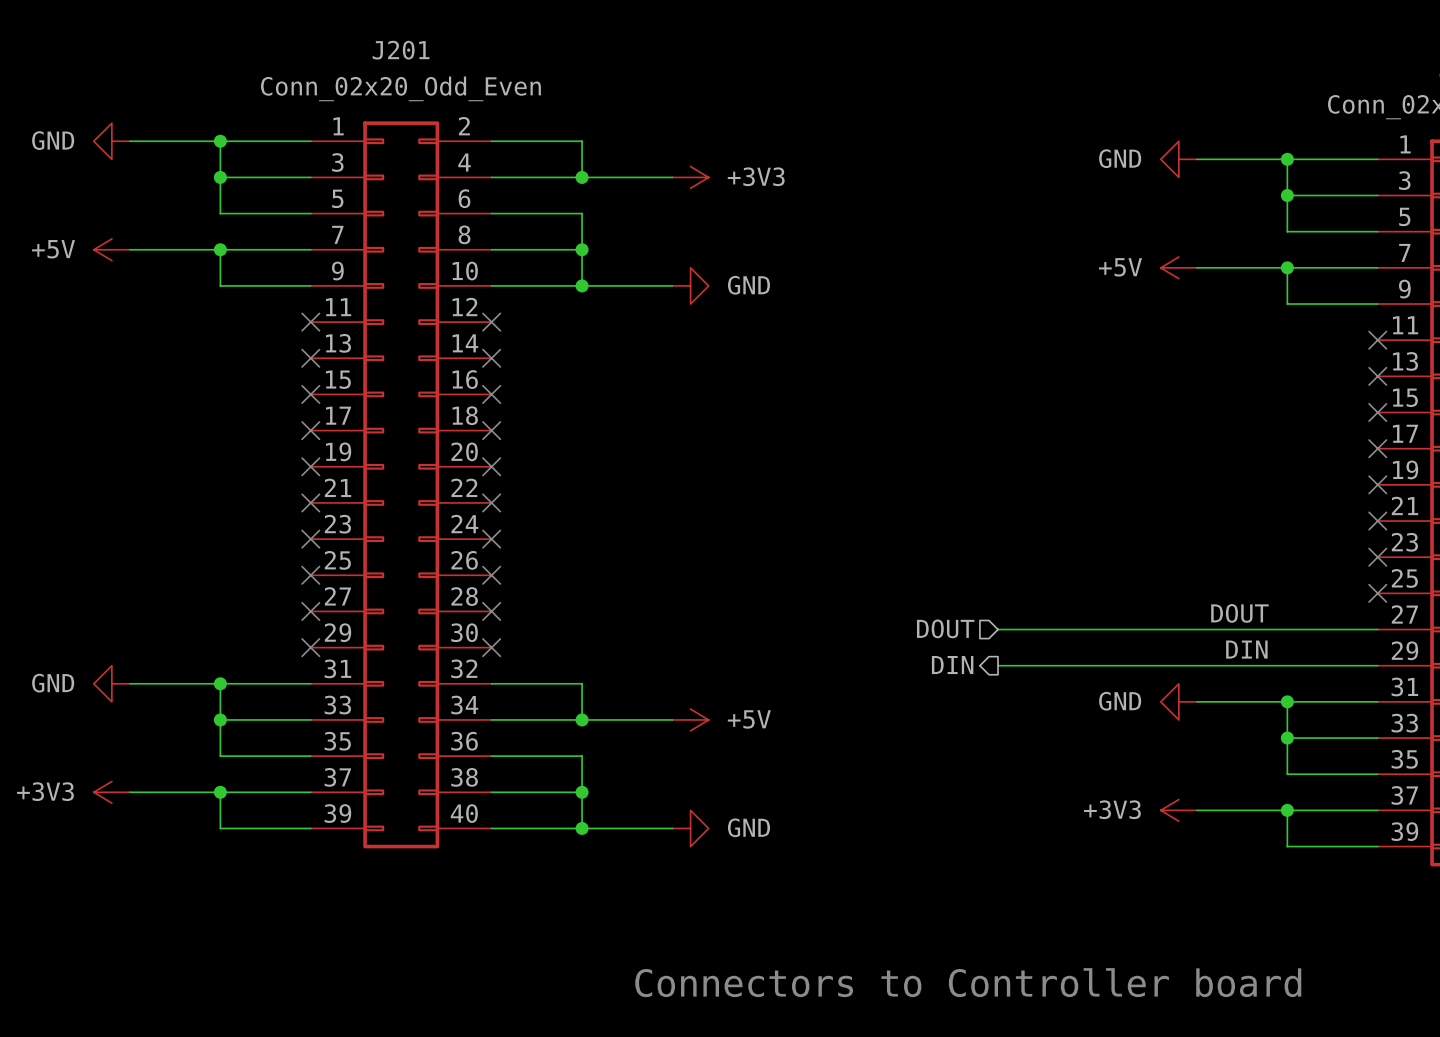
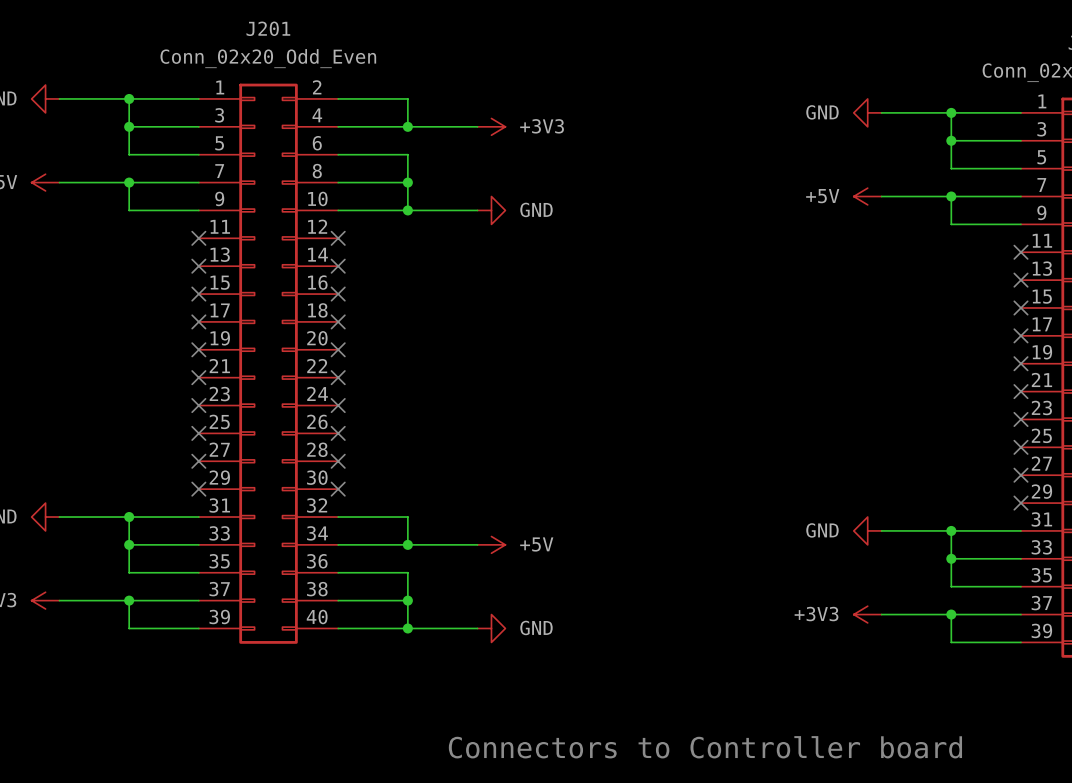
label: DOUT (1239, 613) -> none
hierarchical label: DOUT (945, 628) -> none
wire: (998, 629) (1377, 629) -> none
no-connect mark: none -> (1020, 475)
label: DIN (1246, 649) -> none
hierarchical label: DIN (952, 665) -> none
wire: (998, 665) (1377, 665) -> none
no-connect mark: none -> (1020, 503)

